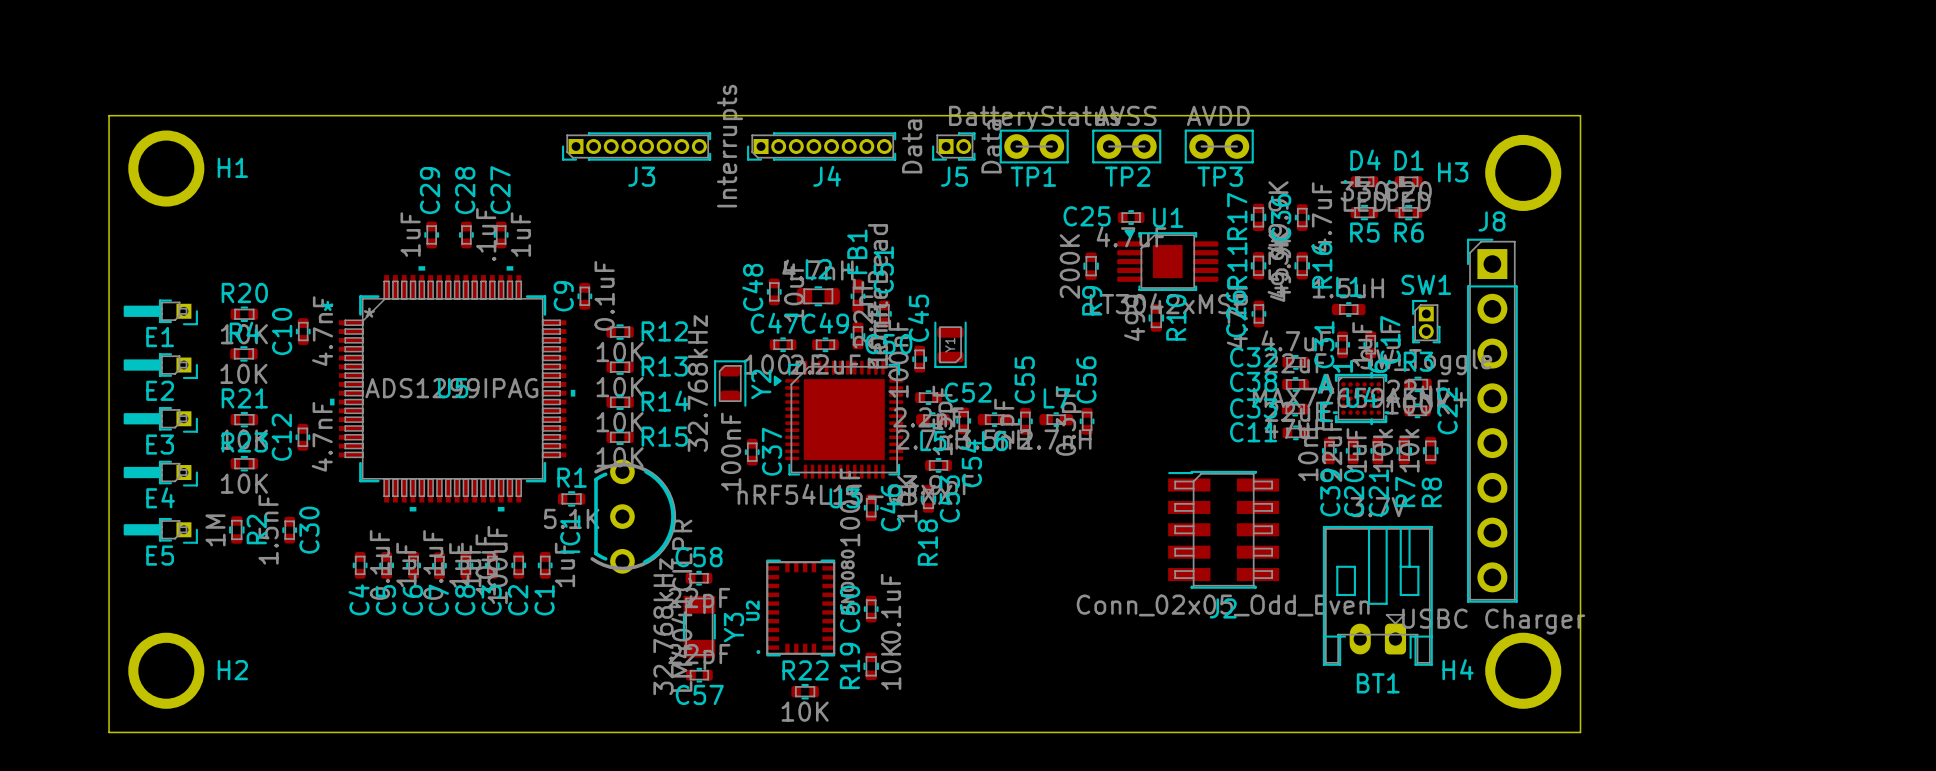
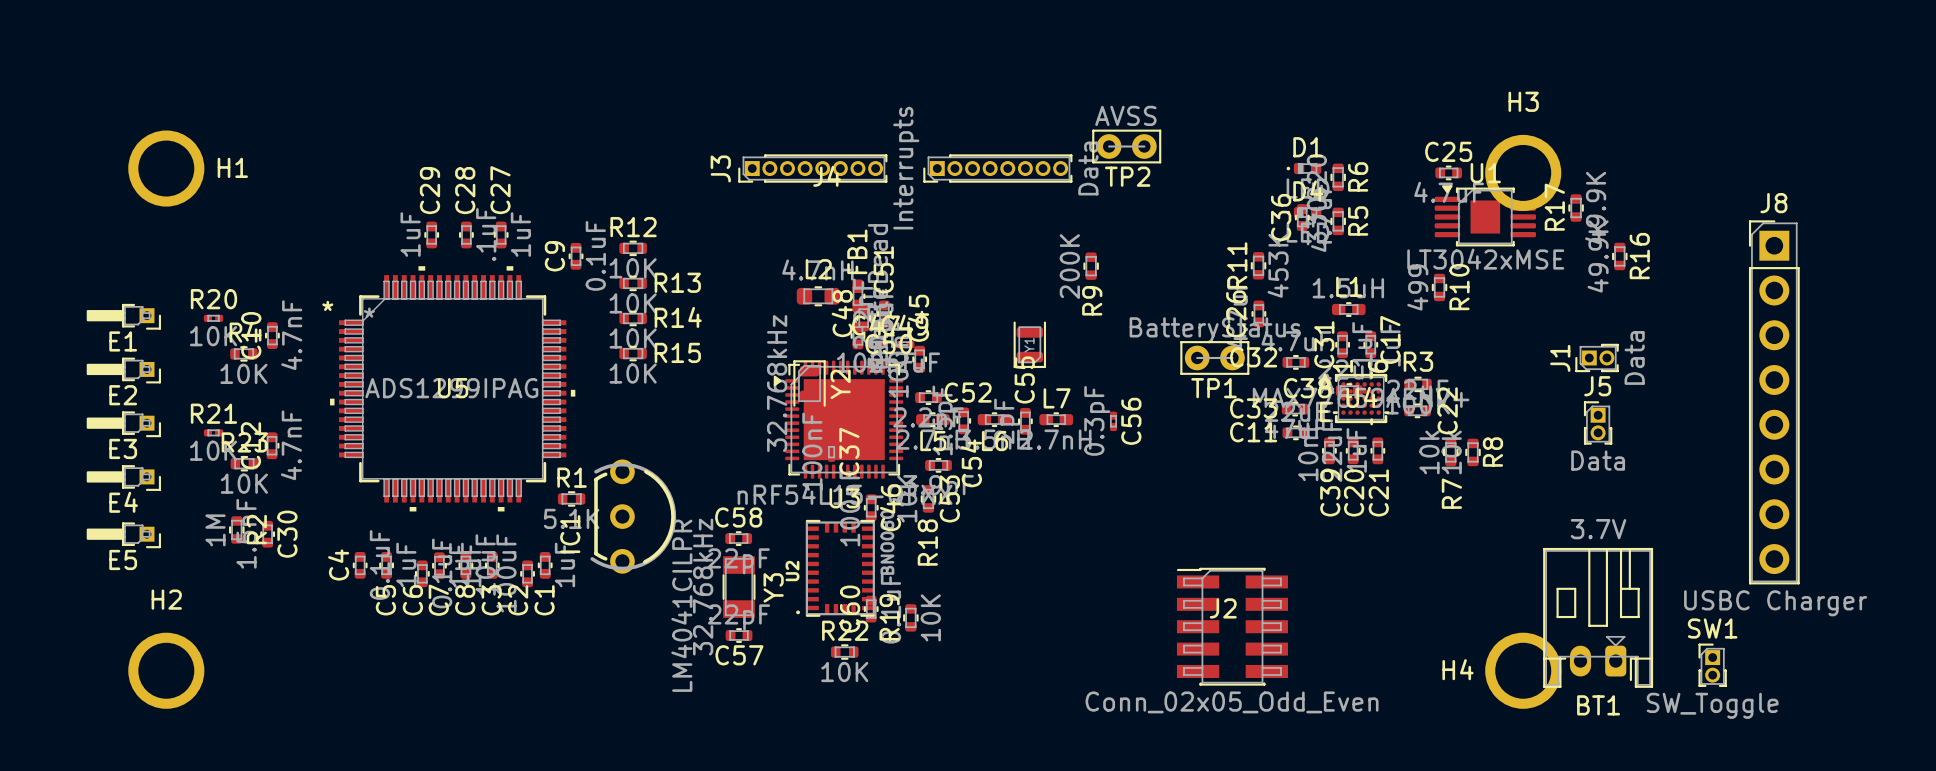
board edge: (109, 115) (1580, 115) (1580, 732) (109, 732) (109, 115) -> none
J3 position: (636, 146) -> (812, 168)
J4 position: (821, 146) -> (997, 168)
J5 rotation: 0° (953, 146) -> 90° clockwise (1598, 422)
J5 position: (953, 146) -> (1598, 422)
TP1 position: (1034, 146) -> (1214, 357)
TP3: AVDD (1219, 146) -> none
H3 name position: H3 (1453, 172) -> H3 (1523, 101)
J3 name rotation: 0° (641, 176) -> 90° counterclockwise (720, 168)
J3 name position: J3 (641, 176) -> J3 (720, 168)
J5 name position: J5 (954, 176) -> J5 (1597, 386)
D4 position: (1361, 181) -> (1304, 212)
D1 position: (1405, 181) -> (1304, 168)
R5 rotation: 0° (1364, 212) -> 90° clockwise (1338, 221)
R5 position: (1364, 212) -> (1338, 221)
R6 rotation: 0° (1408, 212) -> 90° clockwise (1338, 177)
R6 position: (1408, 212) -> (1338, 177)
C25 name position: C25 (1087, 216) -> C25 (1448, 151)
C25 position: (1131, 217) -> (1448, 172)
R17 position: (1258, 217) -> (1576, 208)
U1 position: (1167, 260) -> (1485, 215)
R16 position: (1302, 265) -> (1619, 256)
C48 position: (774, 291) -> (863, 317)
C9 position: (584, 296) -> (576, 256)
R20 footprint: [230, 306, 259, 323] -> [203, 314, 224, 322]
E1 position: (160, 312) -> (123, 316)
R10 position: (1156, 317) -> (1439, 287)
SW1 position: (1426, 321) -> (1712, 665)
C10 position: (303, 331) -> (272, 335)
R12 name position: R12 (664, 331) -> R12 (633, 227)
R12 position: (620, 332) -> (633, 248)
C47 footprint: [769, 337, 797, 353] -> [865, 341, 886, 349]
C49 footprint: [812, 337, 839, 353] -> [895, 341, 915, 349]
Y1 position: (950, 344) -> (1029, 344)
J1: none -> Data (1597, 357)
E2 position: (160, 366) -> (123, 370)
R13 position: (620, 367) -> (633, 283)
C56 name position: C56 (1086, 380) -> C56 (1131, 421)
Y2 position: (730, 383) -> (809, 383)
C38 position: (1295, 384) -> (1349, 390)
R14 position: (620, 402) -> (633, 318)
C56 footprint: [1079, 407, 1095, 435] -> [1109, 411, 1118, 432]
R21 footprint: [230, 411, 259, 428] -> [203, 429, 224, 437]
E3 position: (160, 419) -> (123, 424)
J8 position: (1492, 420) -> (1774, 402)
C12 position: (302, 437) -> (272, 445)
R15 position: (620, 437) -> (633, 353)
C37 footprint: [744, 438, 760, 466] -> [828, 442, 836, 462]
R7 position: (1404, 450) -> (1450, 452)
R8 position: (1430, 450) -> (1473, 452)
E4 position: (160, 473) -> (123, 478)
R8 name position: R8 (1431, 492) -> R8 (1492, 452)
J2 position: (1223, 529) -> (1232, 626)
E5 position: (160, 530) -> (123, 535)
C30 position: (289, 530) -> (267, 534)
C6 position: (413, 565) -> (422, 573)
C2 position: (518, 565) -> (527, 573)
C58 position: (699, 578) -> (738, 538)
BT1 position: (1377, 595) -> (1598, 617)
C4 name position: C4 (359, 599) -> C4 (338, 564)
U2 position: (795, 607) -> (835, 568)
Y3 position: (699, 626) -> (739, 587)
R19 position: (871, 666) -> (910, 617)
H2 name position: H2 (232, 670) -> H2 (166, 599)
C57 position: (699, 675) -> (739, 635)
R22 position: (805, 691) -> (844, 652)

